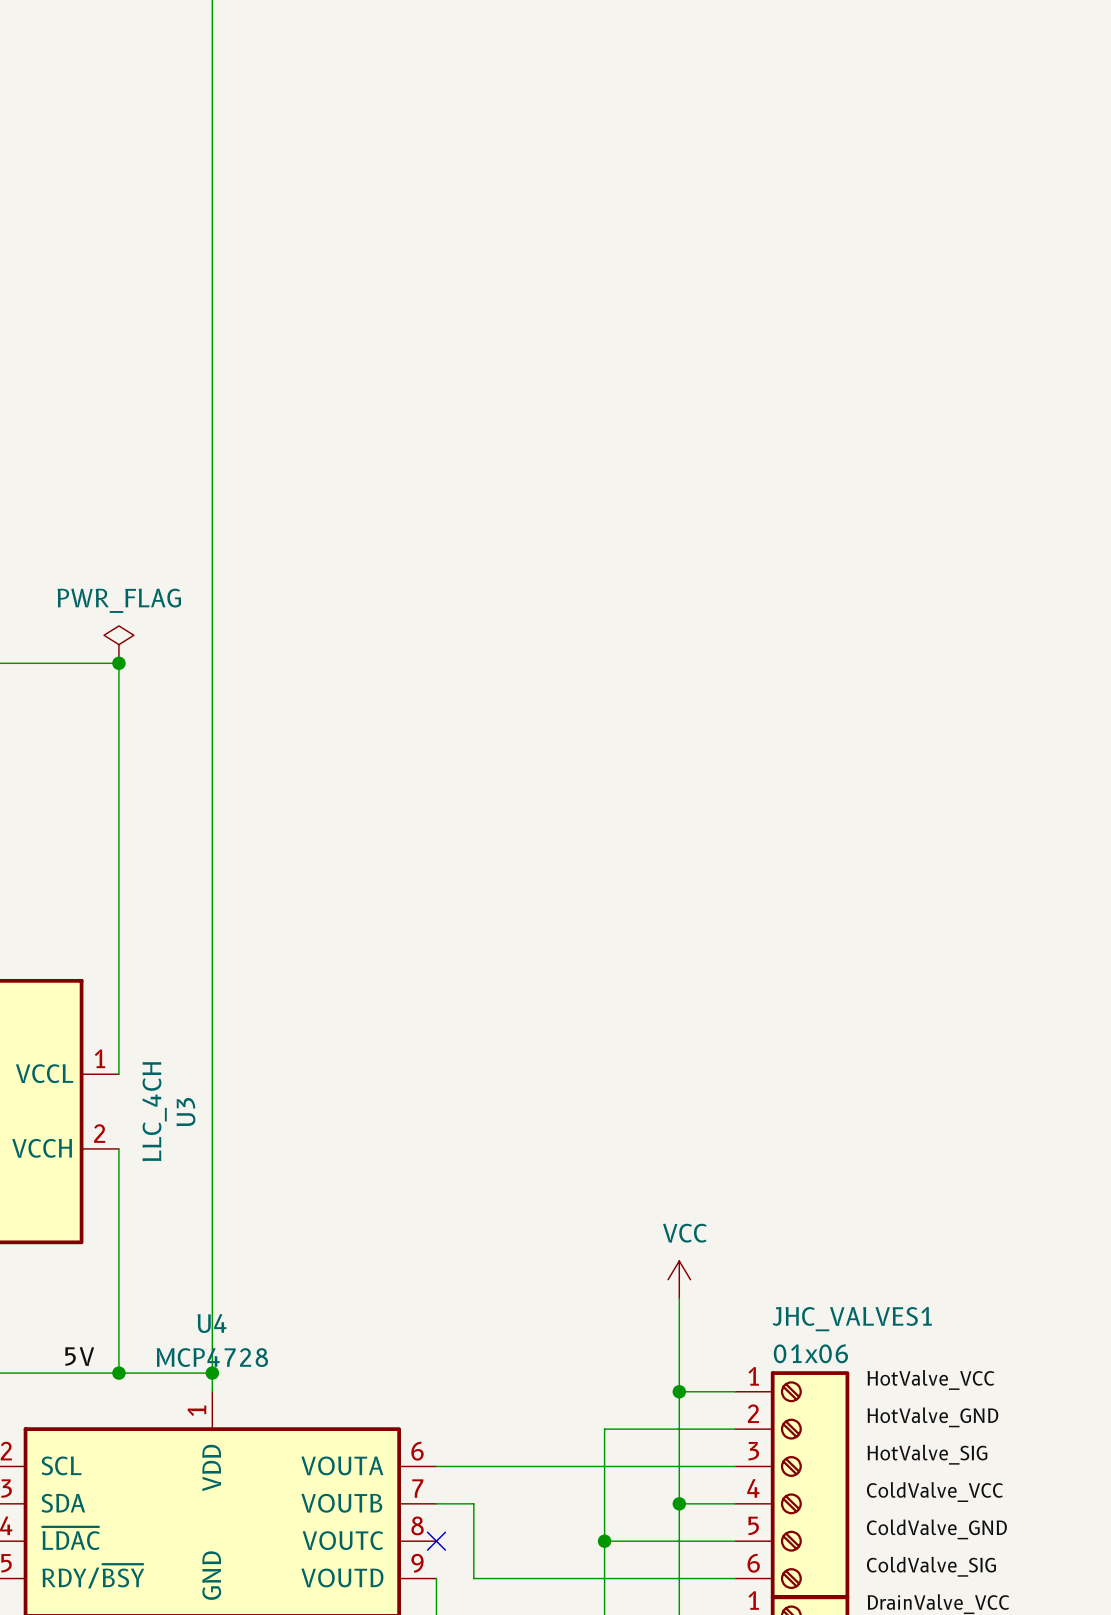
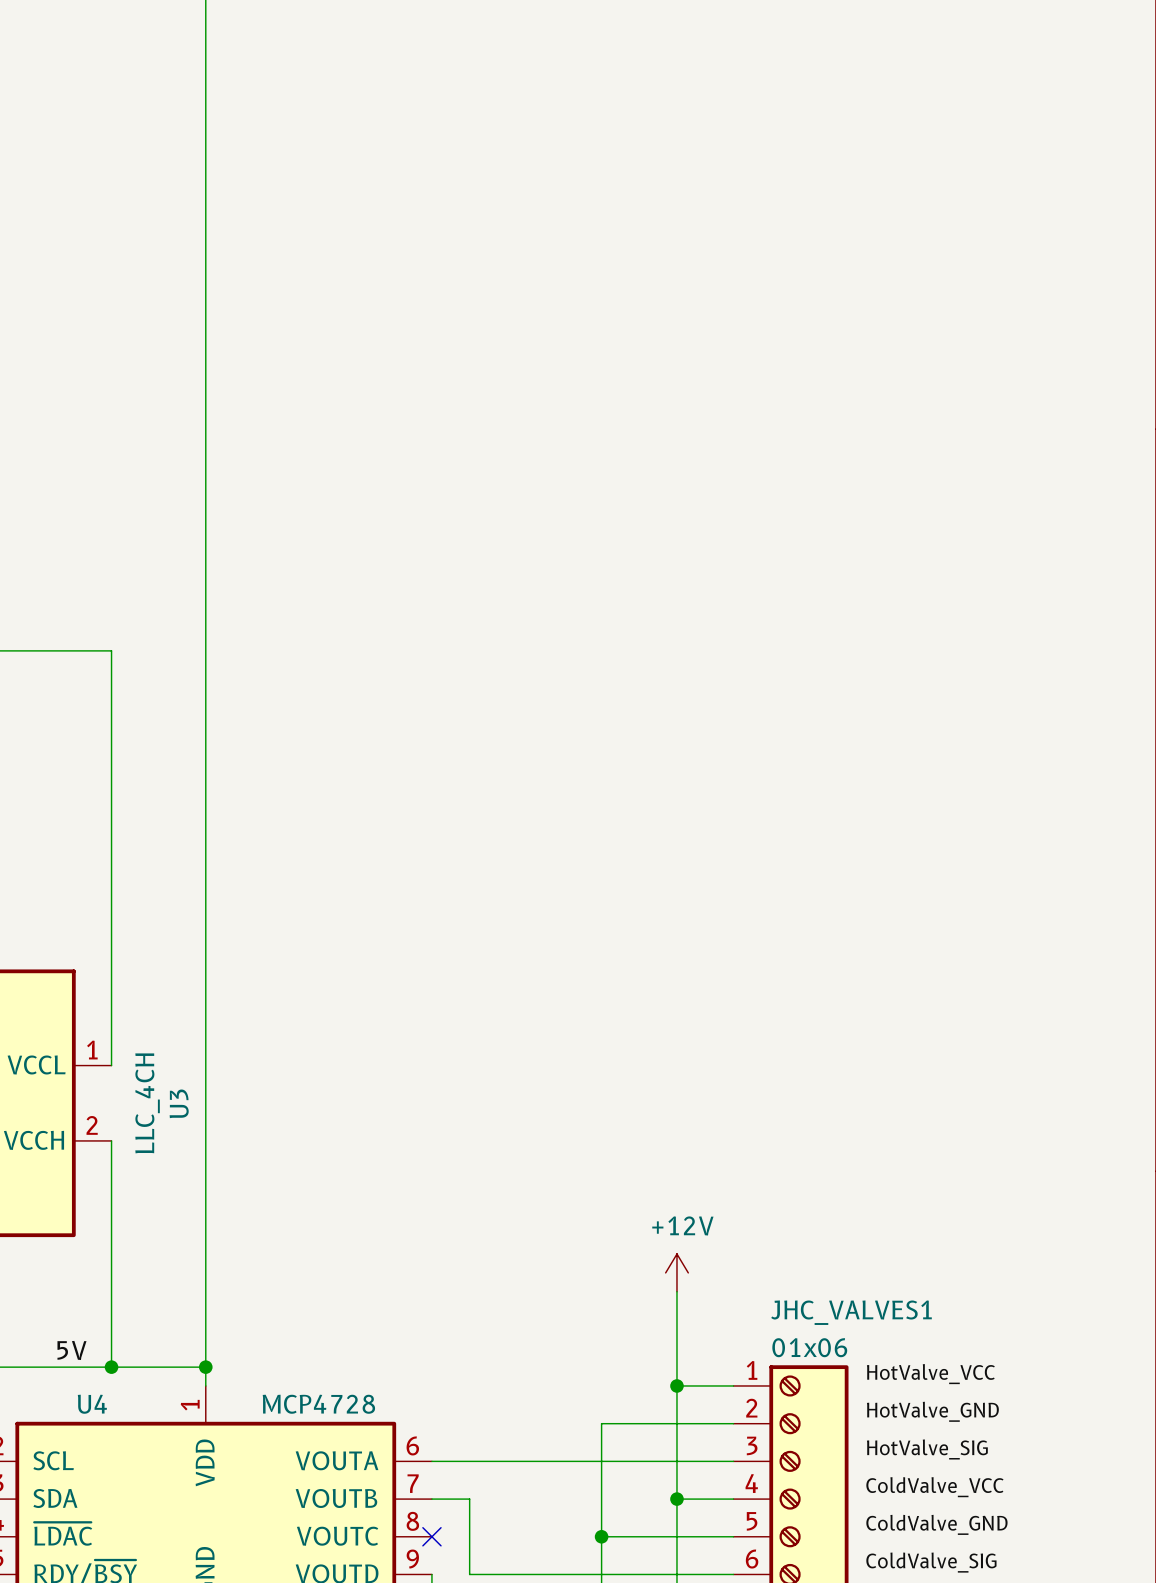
power symbol: PWR_FLAG (118, 644) -> none
junction: (118, 663) -> none
power symbol: VCC (679, 1279) -> +12V (676, 1272)
U4 name position: U4 (212, 1323) -> U4 (92, 1404)
U4 value position: MCP4728 (212, 1357) -> MCP4728 (318, 1404)

